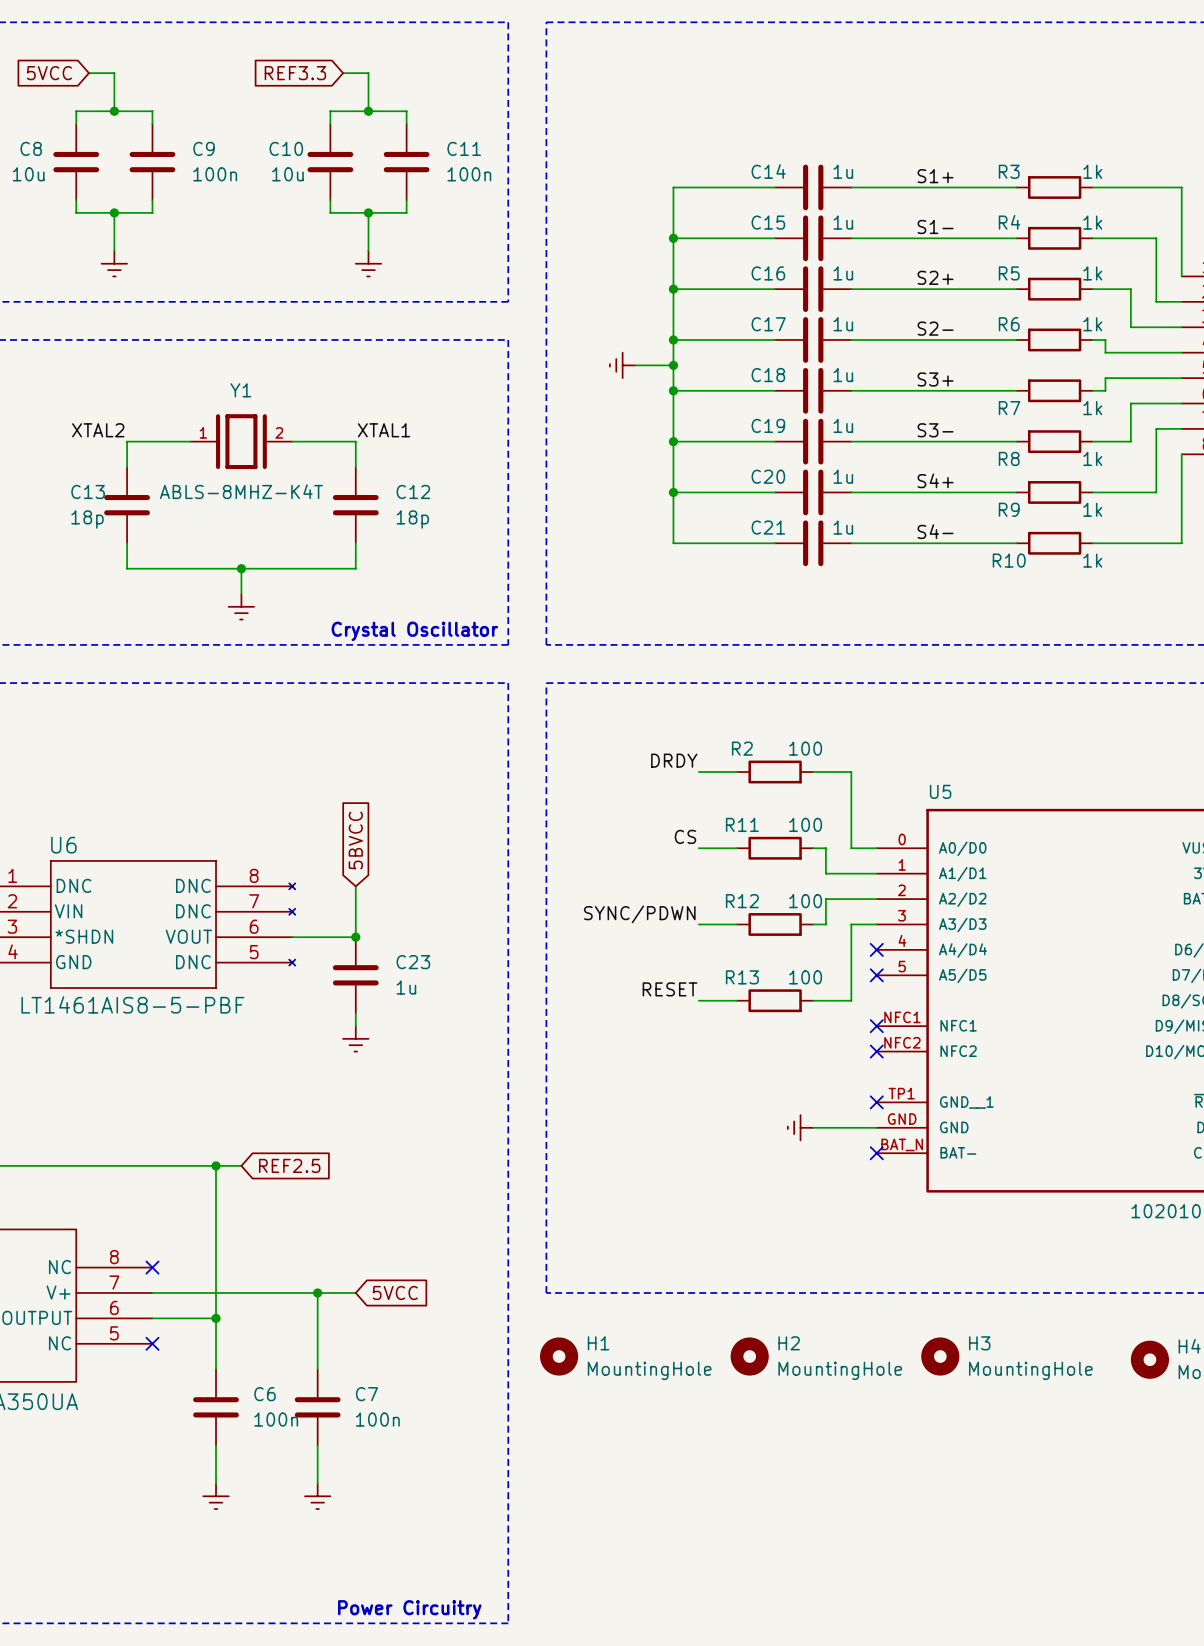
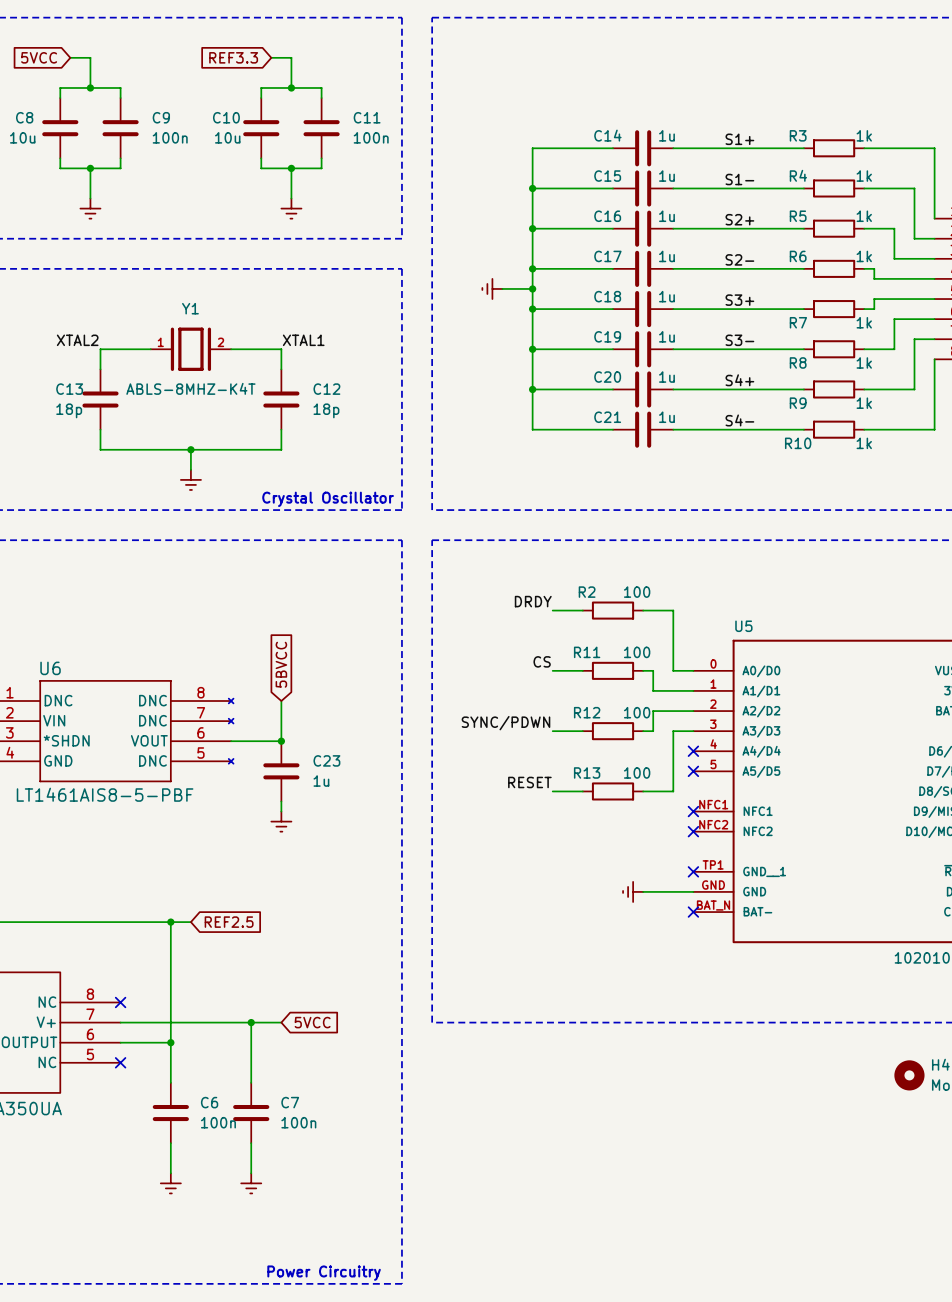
H1: MountingHole (559, 1356) -> none
H2: MountingHole (749, 1356) -> none
H3: MountingHole (940, 1356) -> none

